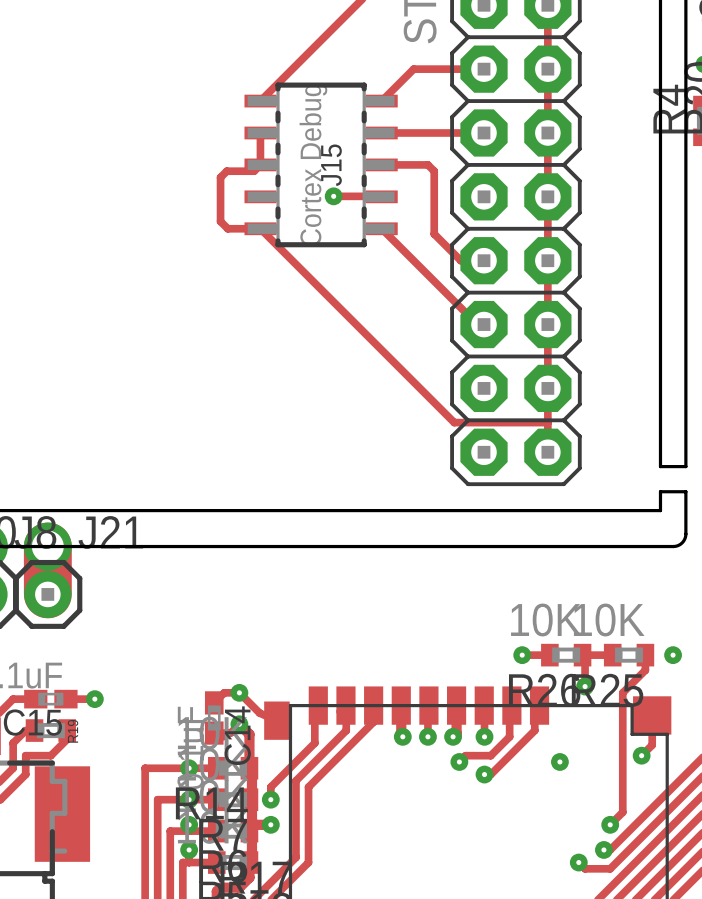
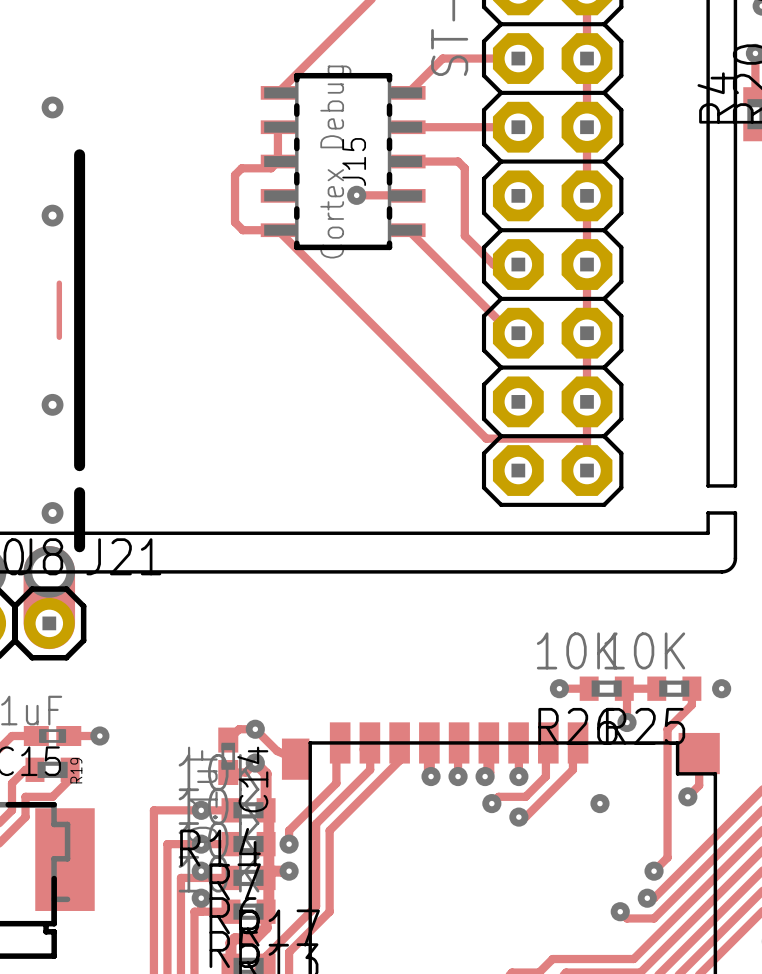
via: none -> (52, 107)
board edge: none -> (79, 154) (79, 465)
via: none -> (52, 215)
track: none -> (59, 283) (59, 337)
via: none -> (52, 404)
board edge: none -> (79, 492) (79, 546)
via: none -> (52, 512)

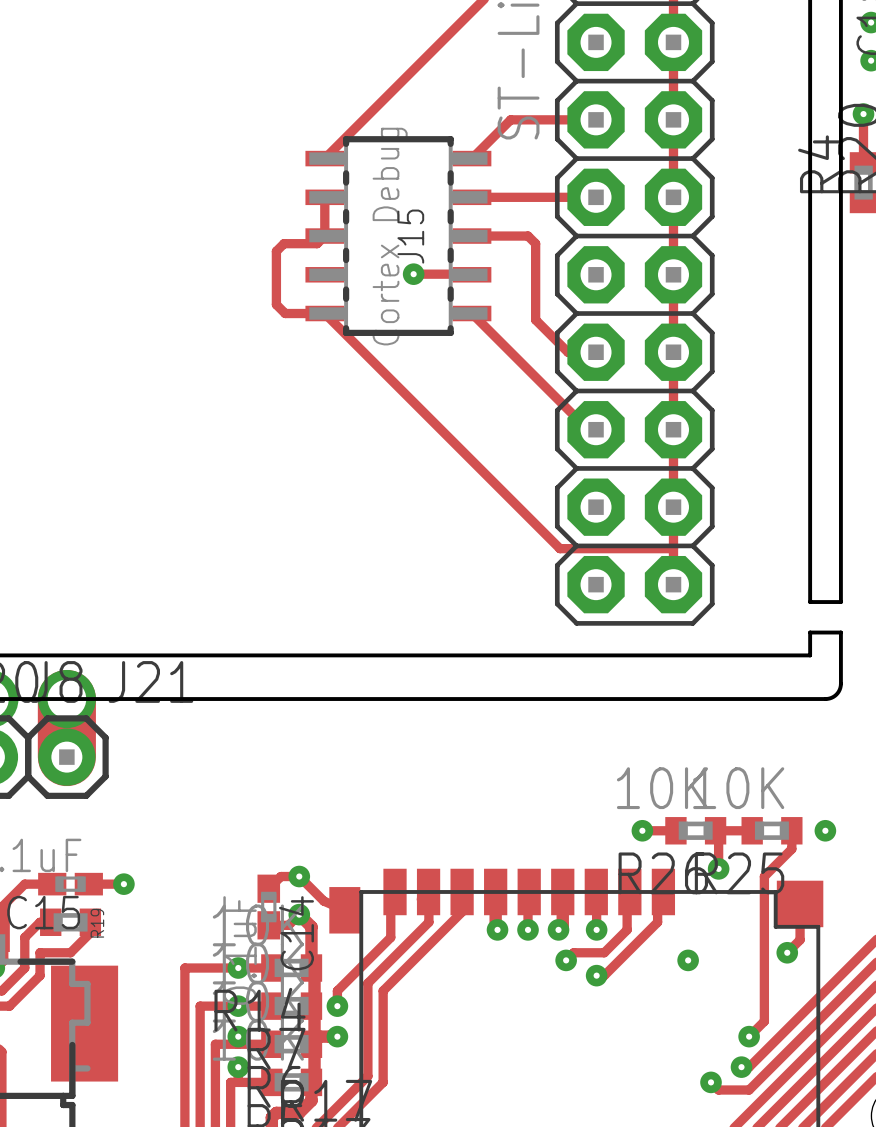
via: (52, 107) -> none
board edge: (79, 154) (79, 465) -> none
via: (52, 215) -> none
track: (59, 283) (59, 337) -> none
via: (52, 404) -> none
board edge: (79, 492) (79, 546) -> none
via: (52, 512) -> none

